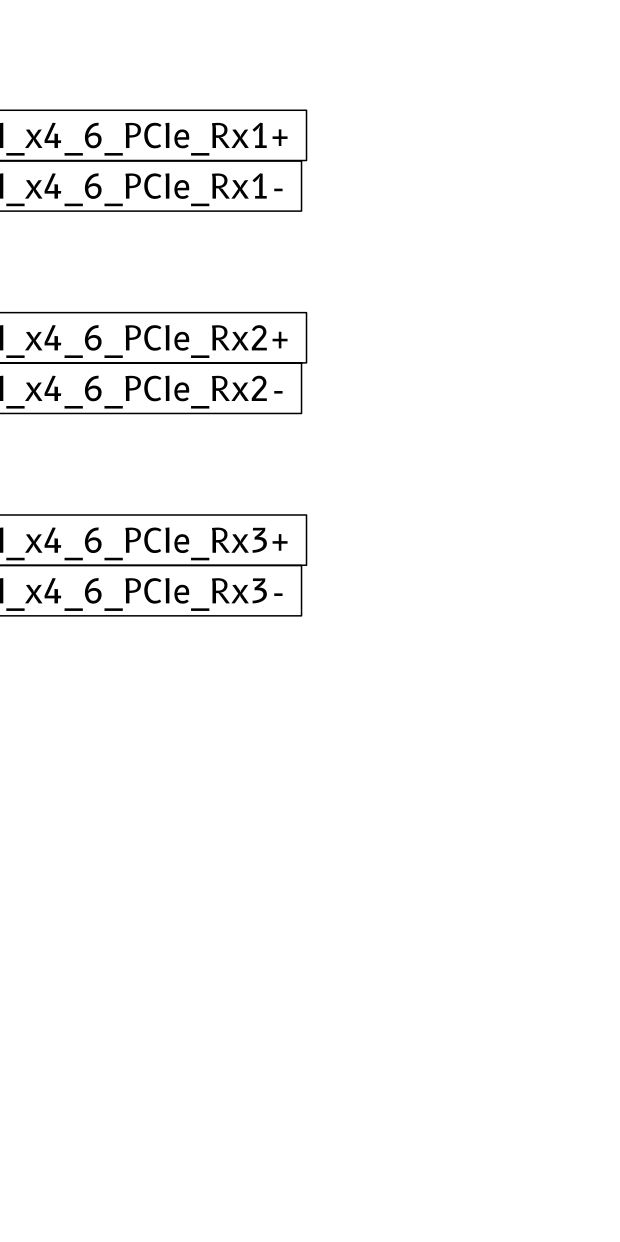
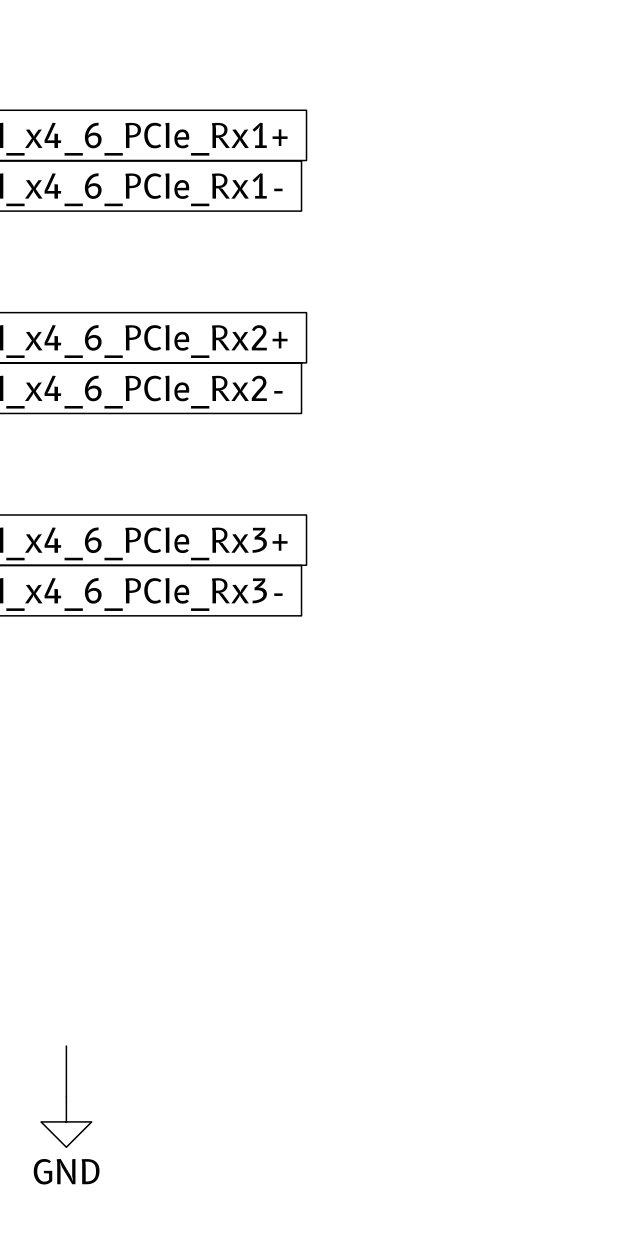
wire: none -> (66, 1046) (66, 1096)
power symbol: none -> GND (66, 1121)

